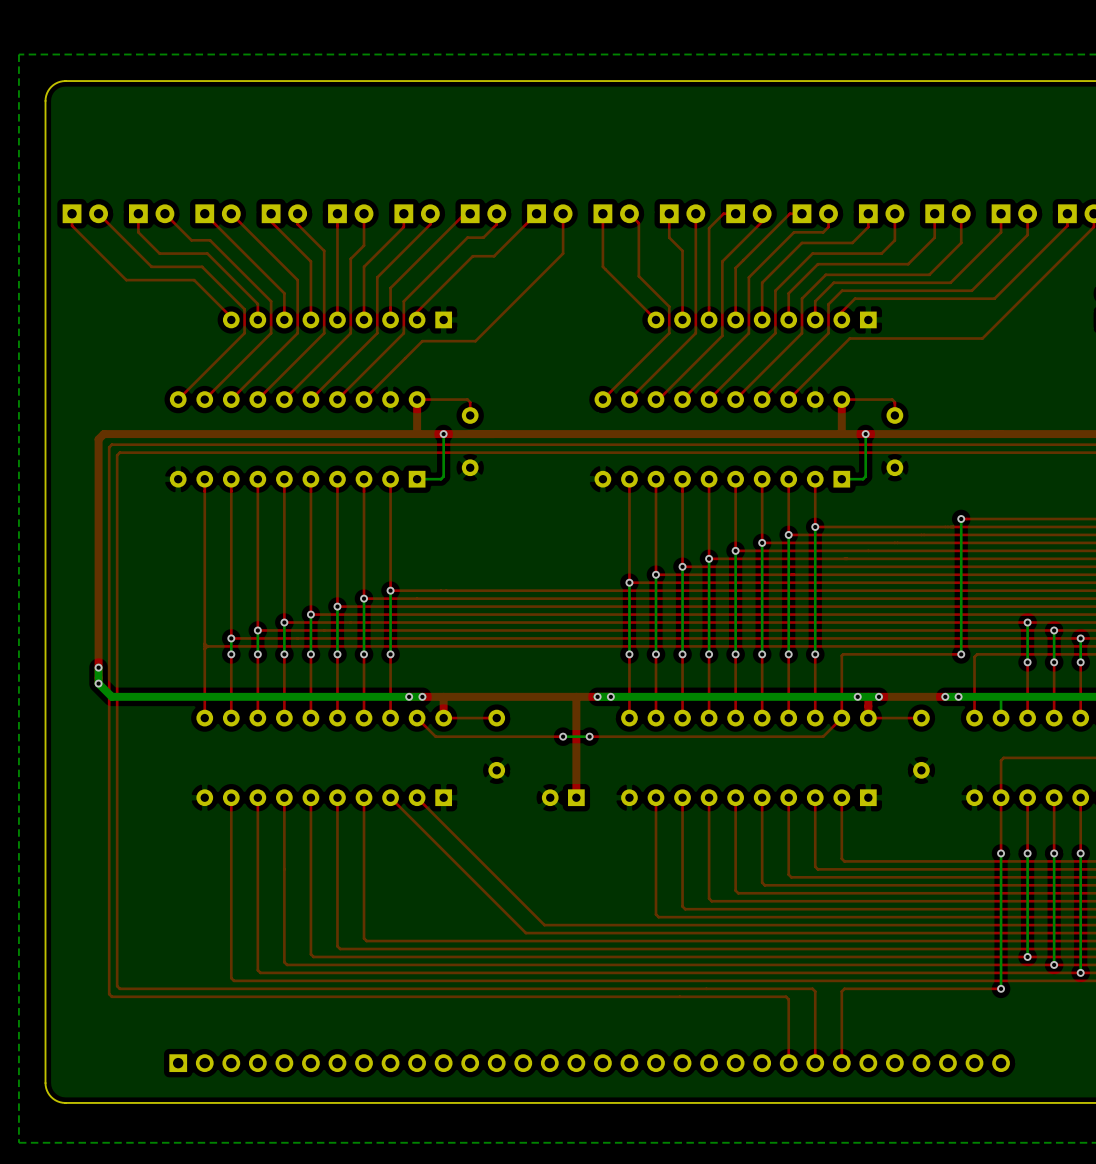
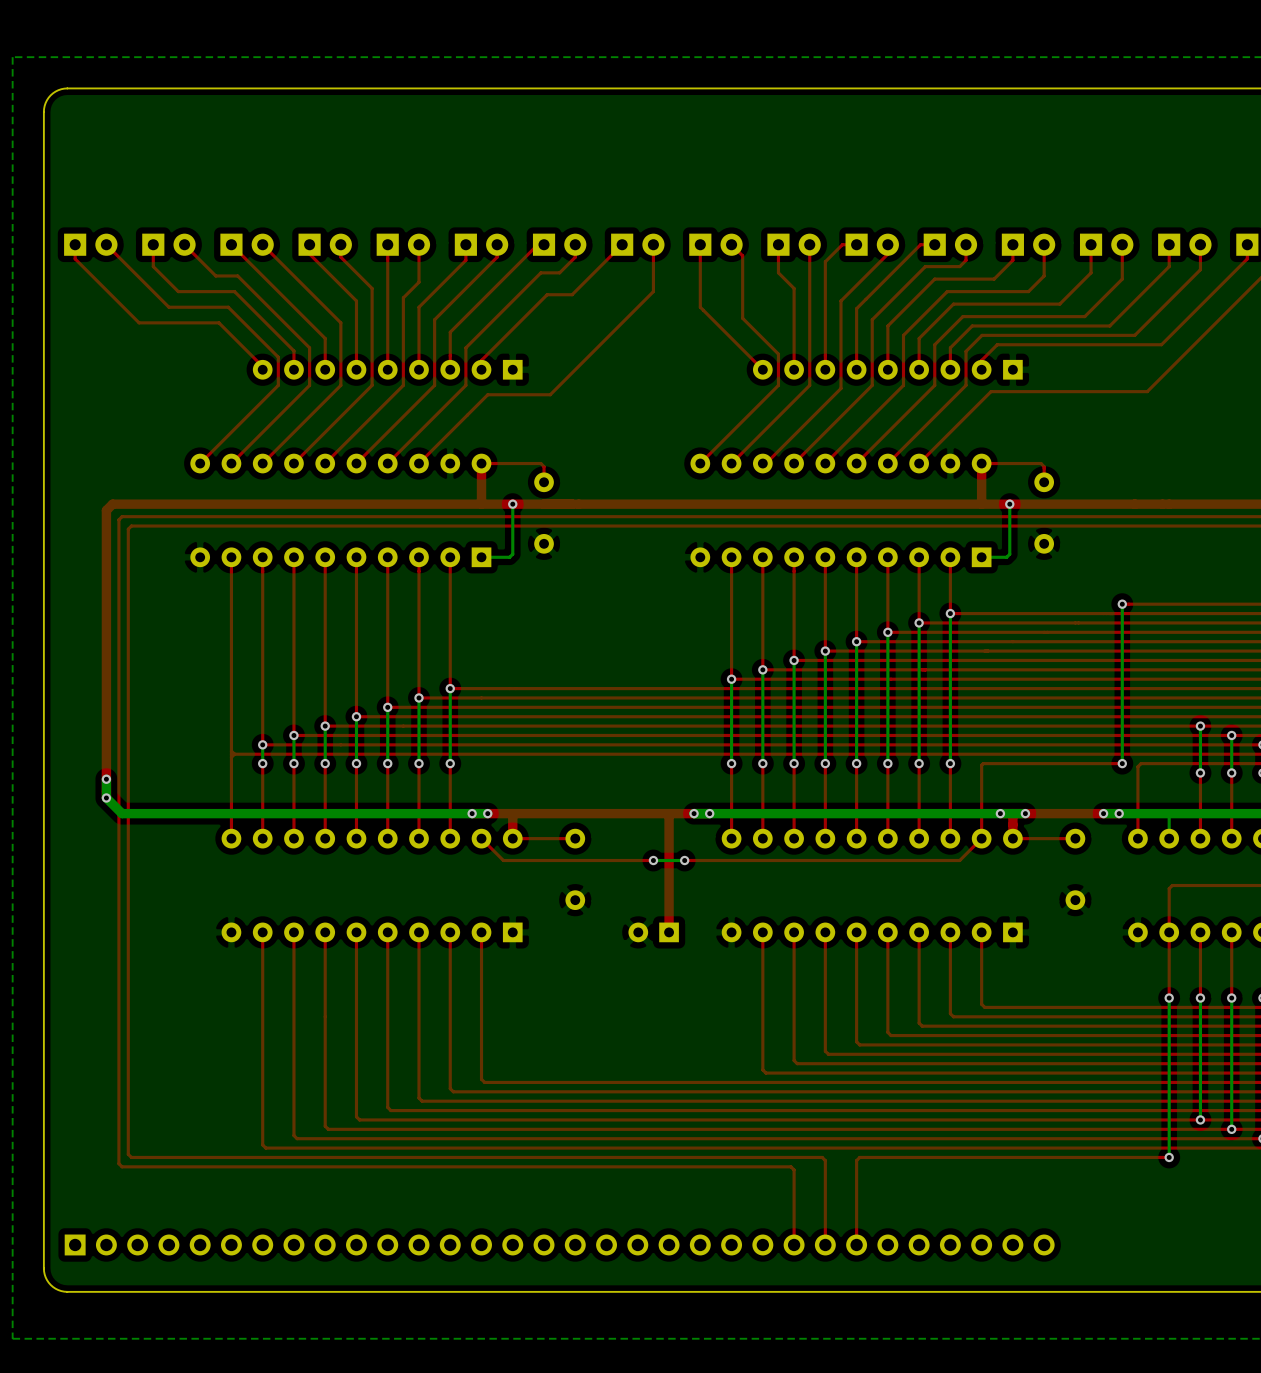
top track: (390, 797) (525, 933) -> (450, 932) (450, 1088) (453, 1091) (609, 1091)
top track: (417, 797) (544, 925) -> (481, 932) (481, 1079) (484, 1082) (631, 1082)
top track: (738, 988) (706, 988) -> (859, 1157) (856, 1160) (856, 1244)
top track: (812, 988) (815, 991) (815, 1063) -> (822, 1157) (825, 1160) (825, 1244)
top track: (844, 988) (841, 991) (841, 1063) -> (984, 1157) (947, 1157)
top track: (679, 996) (786, 996) (788, 999) (788, 1063) -> (790, 1166) (794, 1169) (794, 1244)
part position: (589, 1063) -> (559, 1244)

